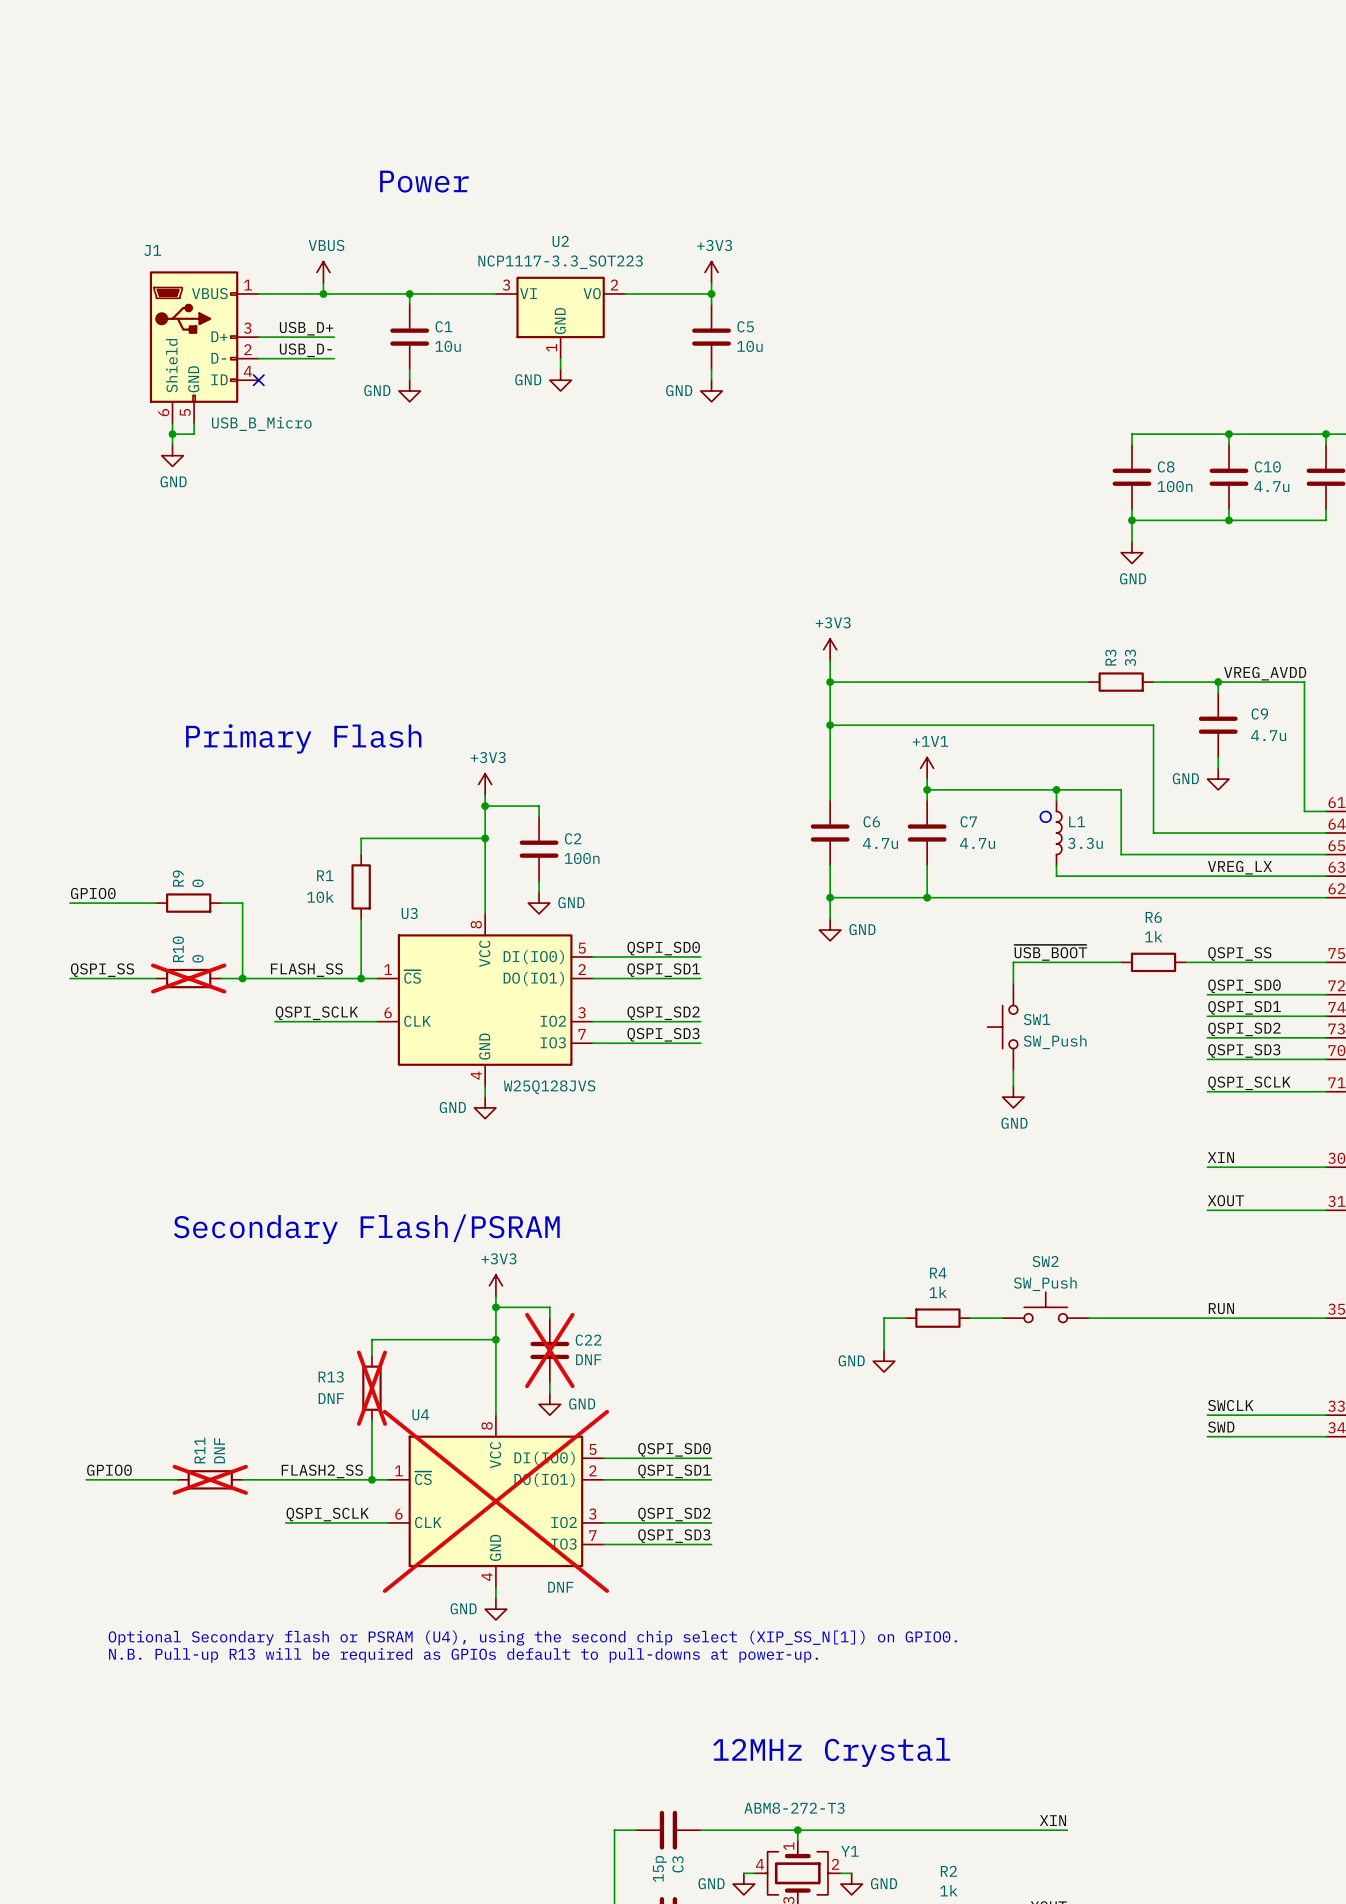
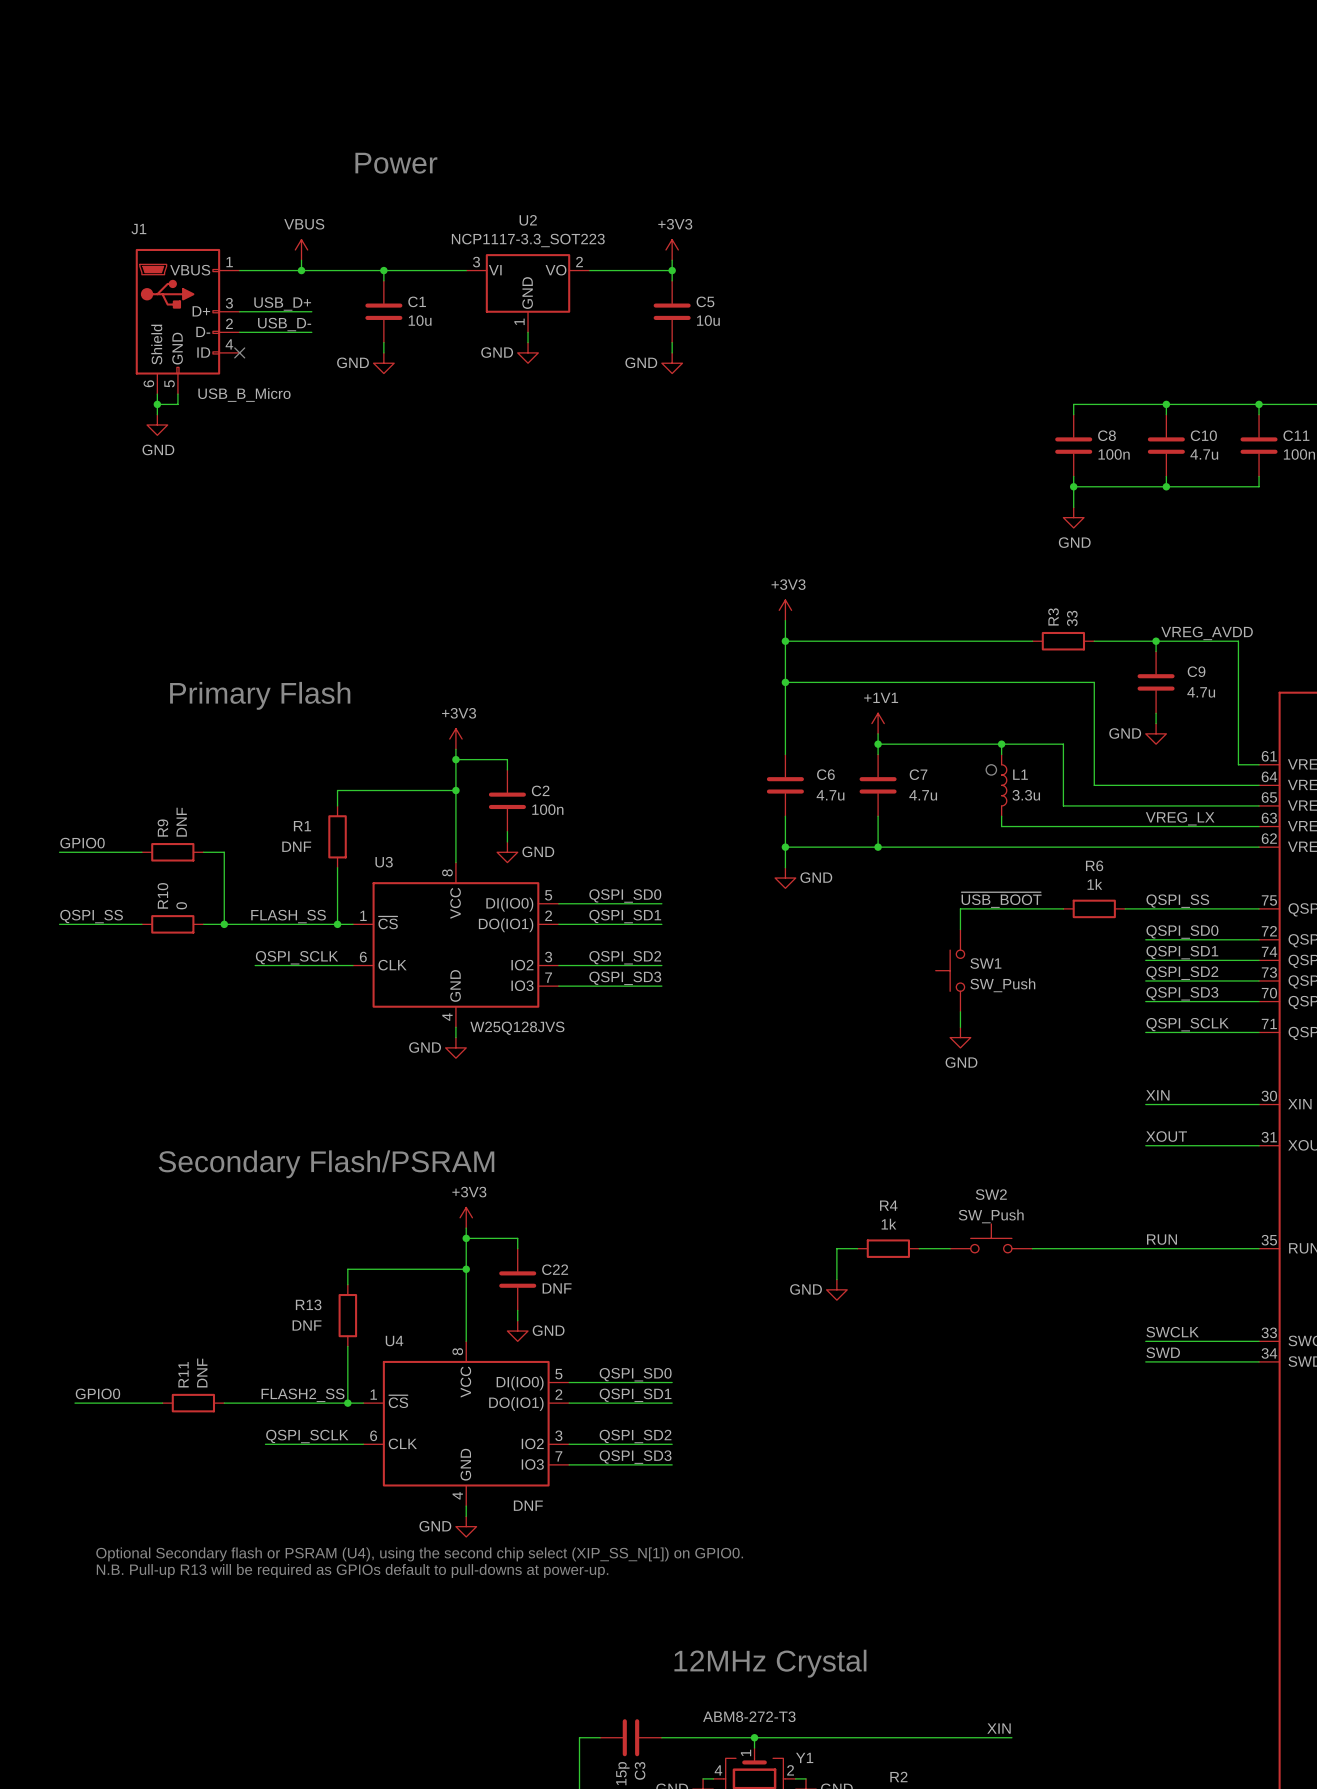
R9 value: 0 (197, 883) -> DNF (181, 822)
R1 value: 10k (320, 897) -> DNF (296, 846)
R10 do-not-place cross: (188, 978) -> none
C22 do-not-place cross: (549, 1350) -> none
R13 do-not-place cross: (371, 1388) -> none
R11 do-not-place cross: (210, 1479) -> none
U4 do-not-place cross: (495, 1501) -> none

